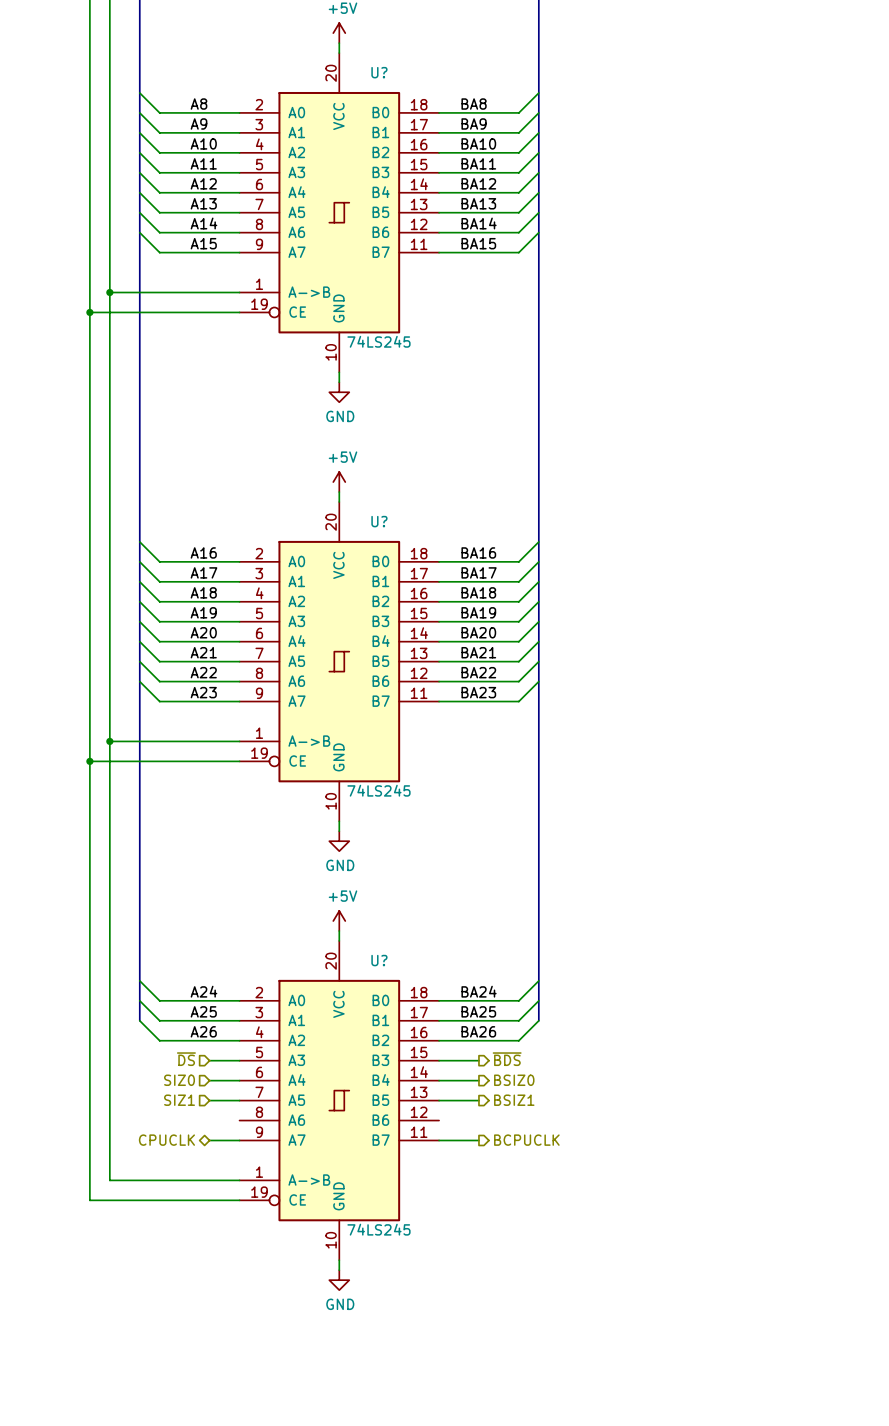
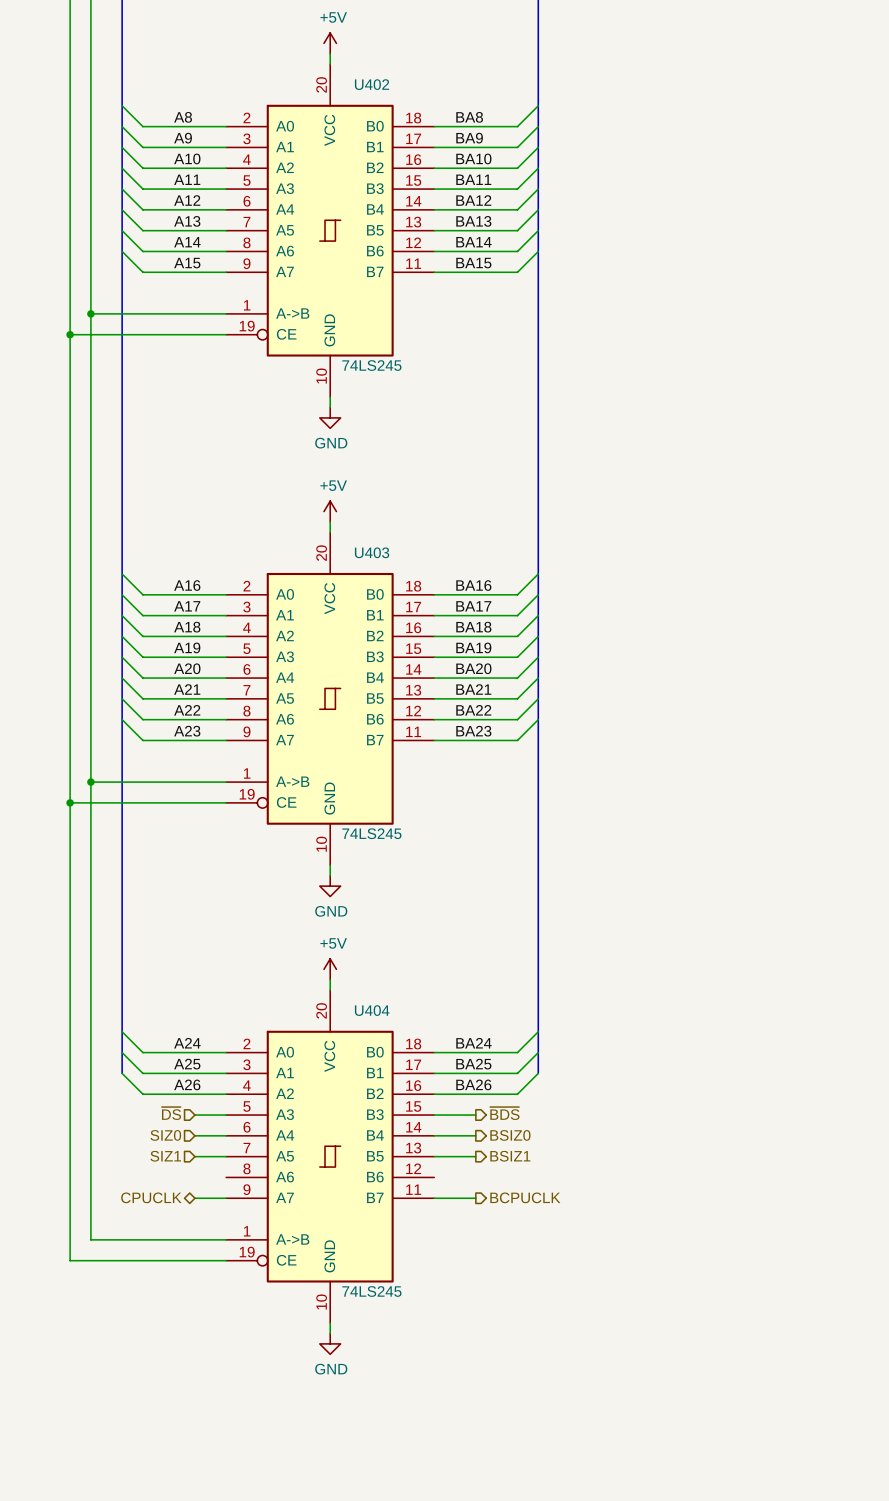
U? name: U? (379, 72) -> U402 (372, 84)
U? name: U? (379, 521) -> U403 (372, 552)
U? name: U? (379, 960) -> U404 (372, 1010)

